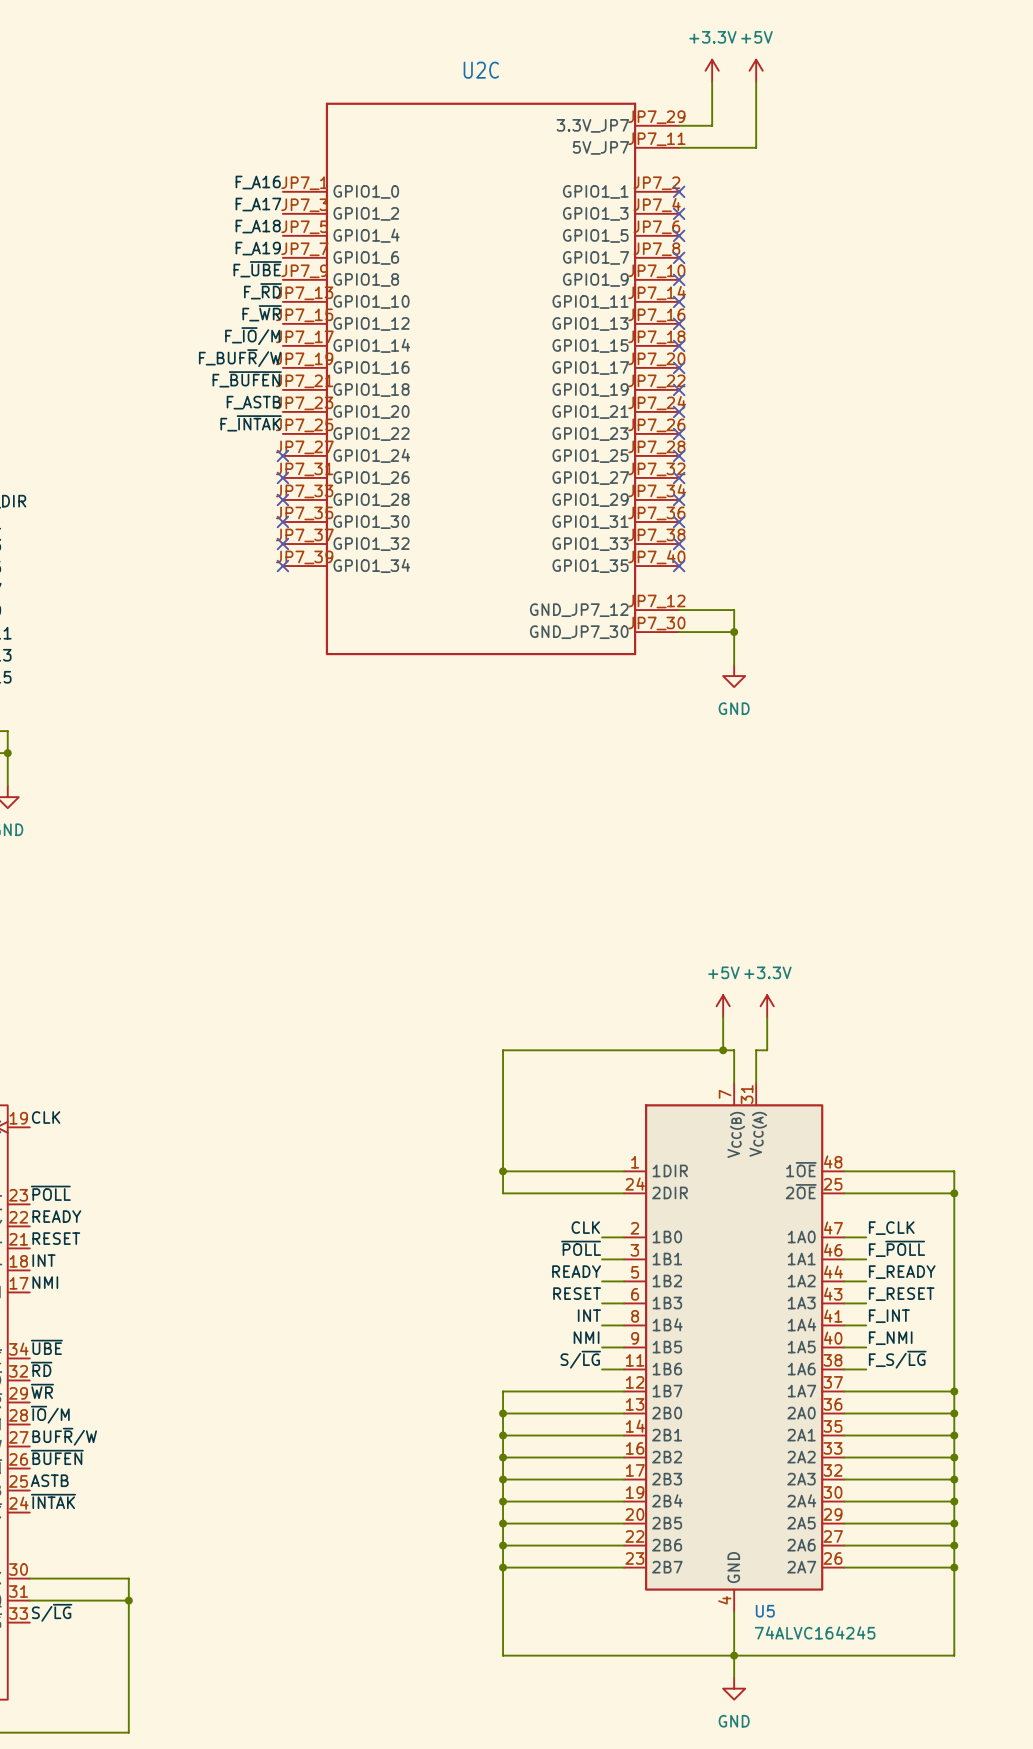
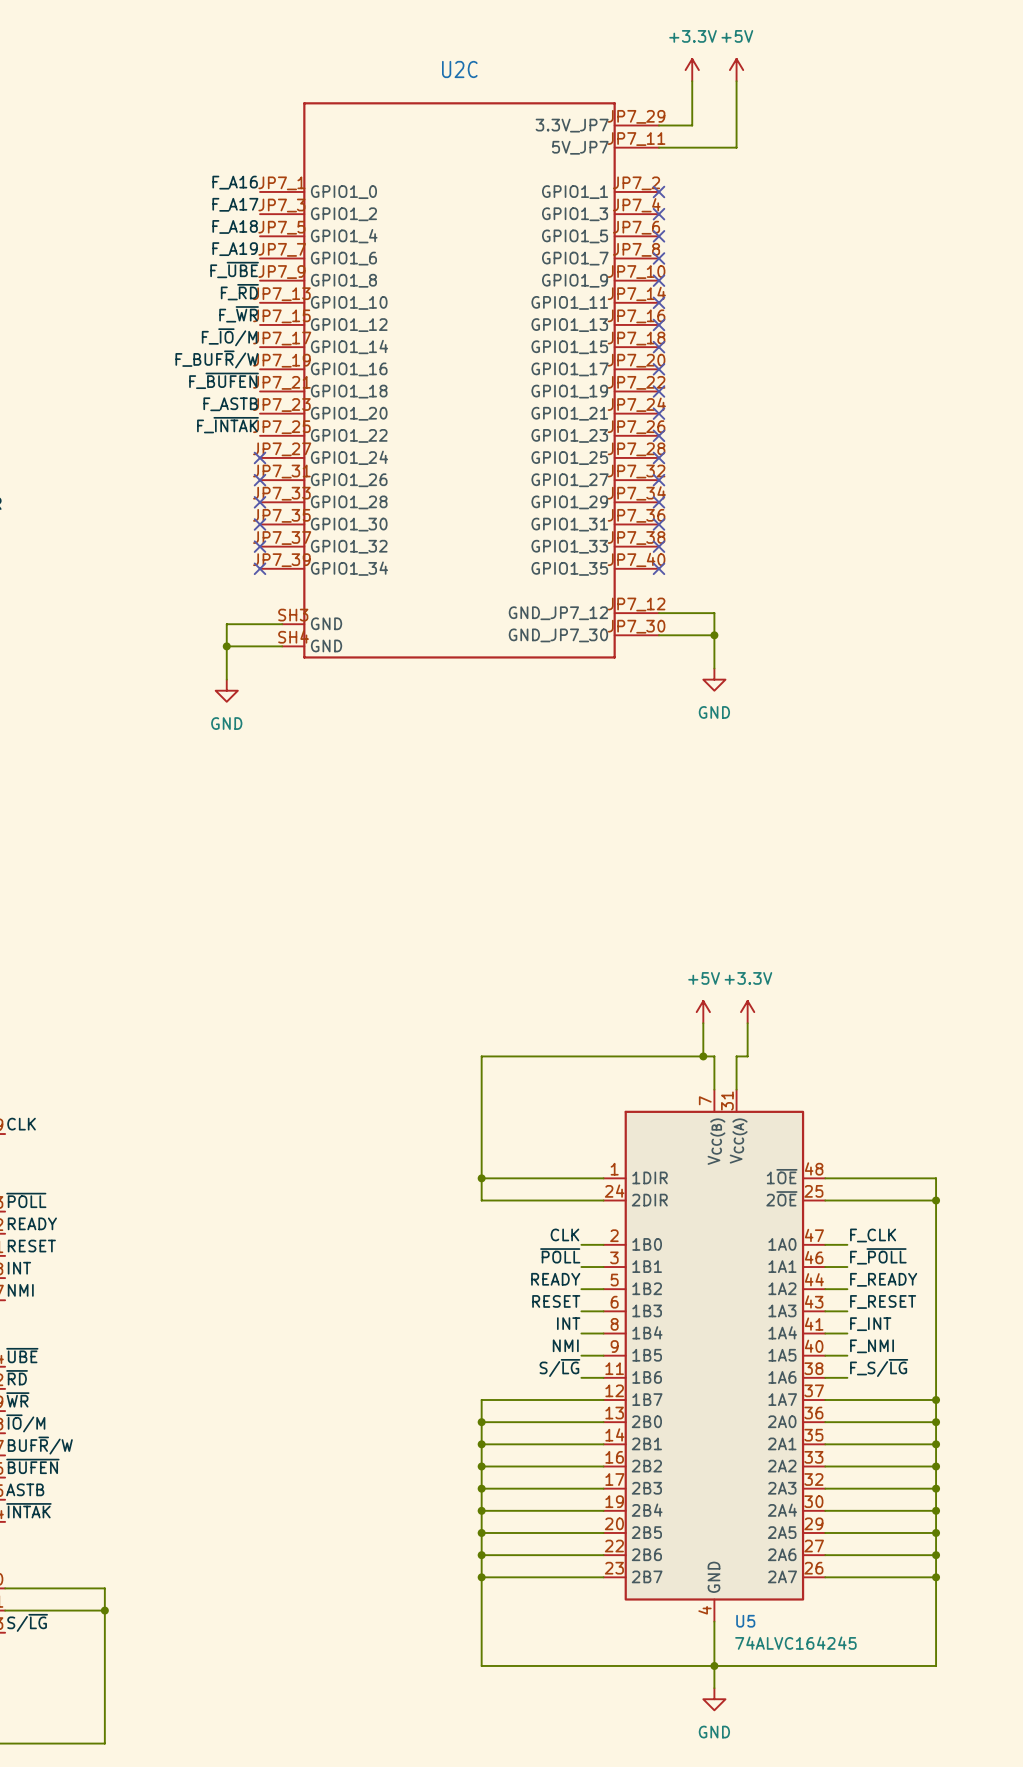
U2C symbol: [282, 102, 680, 656] -> [260, 102, 659, 659]
wire: none -> (282, 624) (226, 624) (226, 679)
wire: none -> (226, 646) (282, 646)
junction: none -> (226, 646)
power symbol: none -> GND (226, 690)

